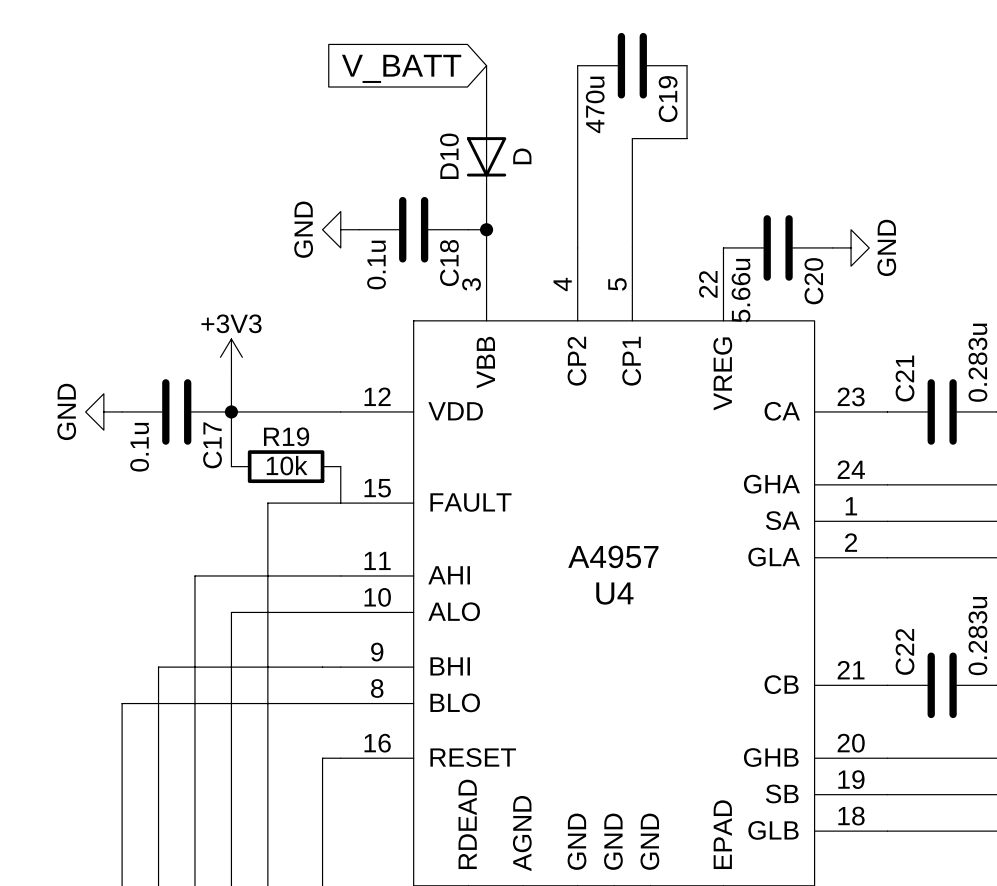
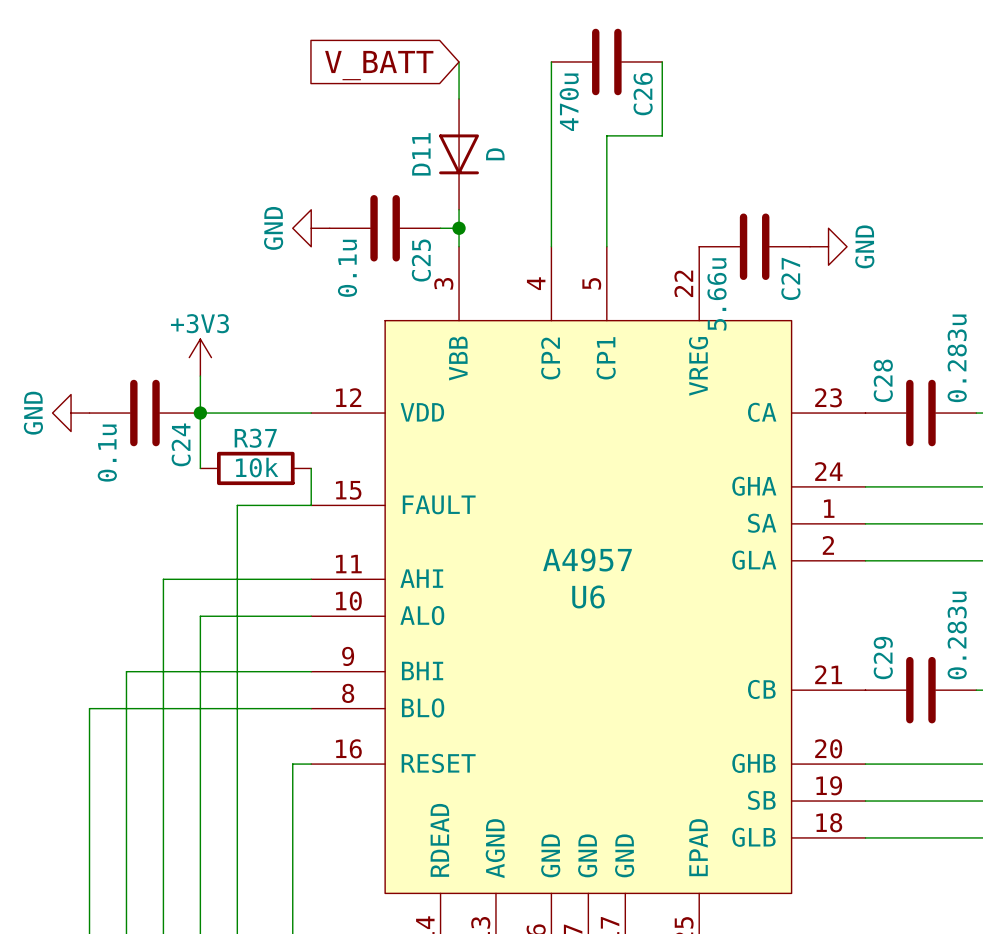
C19 name: C19 (668, 99) -> C26 (643, 94)
D10 name: D10 (449, 156) -> D11 (421, 154)
C18 name: C18 (449, 263) -> C25 (421, 260)
C20 name: C20 (813, 281) -> C27 (790, 278)
C21 name: C21 (905, 378) -> C28 (883, 380)
R19 name: R19 (286, 436) -> R37 (255, 438)
C17 name: C17 (212, 445) -> C24 (181, 444)
U4 name: U4 (614, 593) -> U6 (588, 596)
C22 name: C22 (905, 651) -> C29 (883, 658)

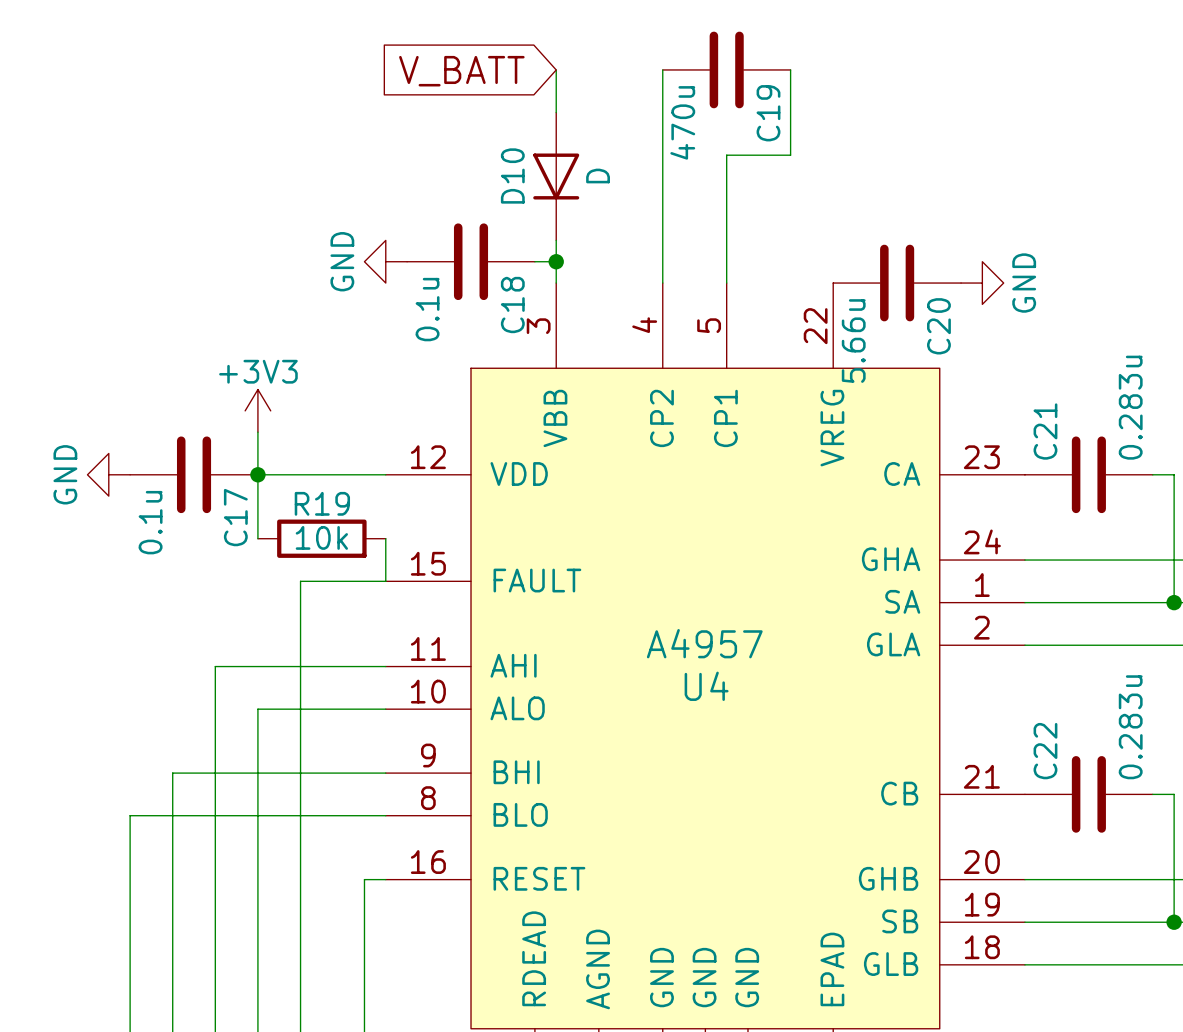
C26 name: C26 (643, 94) -> C19 (768, 113)
D11 name: D11 (421, 154) -> D10 (512, 175)
C25 name: C25 (421, 260) -> C18 (512, 305)
C27 name: C27 (790, 278) -> C20 (938, 326)
C28 name: C28 (883, 380) -> C21 (1045, 431)
R37 name: R37 (255, 438) -> R19 (322, 503)
C24 name: C24 (181, 444) -> C17 (235, 517)
U6 name: U6 (588, 596) -> U4 (706, 686)
C29 name: C29 (883, 658) -> C22 (1045, 751)

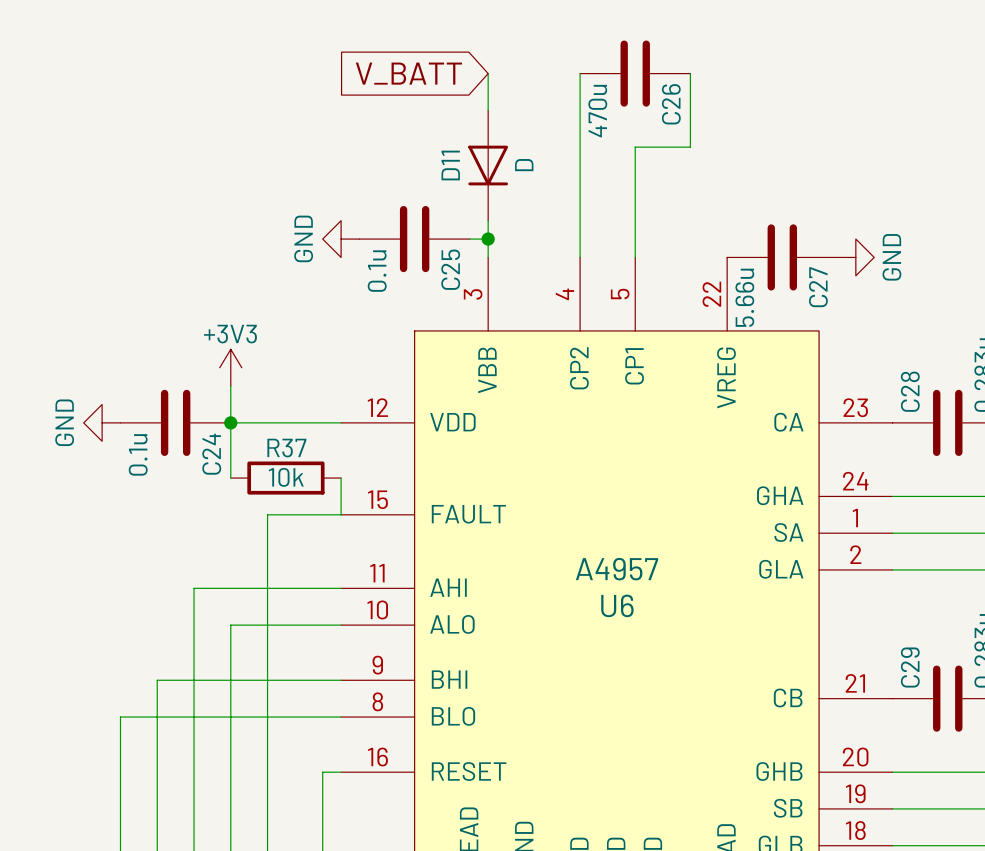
C19 name: C19 (768, 113) -> C26 (671, 104)
D10 name: D10 (512, 175) -> D11 (450, 165)
C18 name: C18 (512, 305) -> C25 (450, 269)
C20 name: C20 (938, 326) -> C27 (818, 287)
C21 name: C21 (1045, 431) -> C28 (910, 391)
R19 name: R19 (322, 503) -> R37 (286, 448)
C17 name: C17 (235, 517) -> C24 (211, 454)
U4 name: U4 (706, 686) -> U6 (617, 605)
C22 name: C22 (1045, 751) -> C29 (910, 667)

